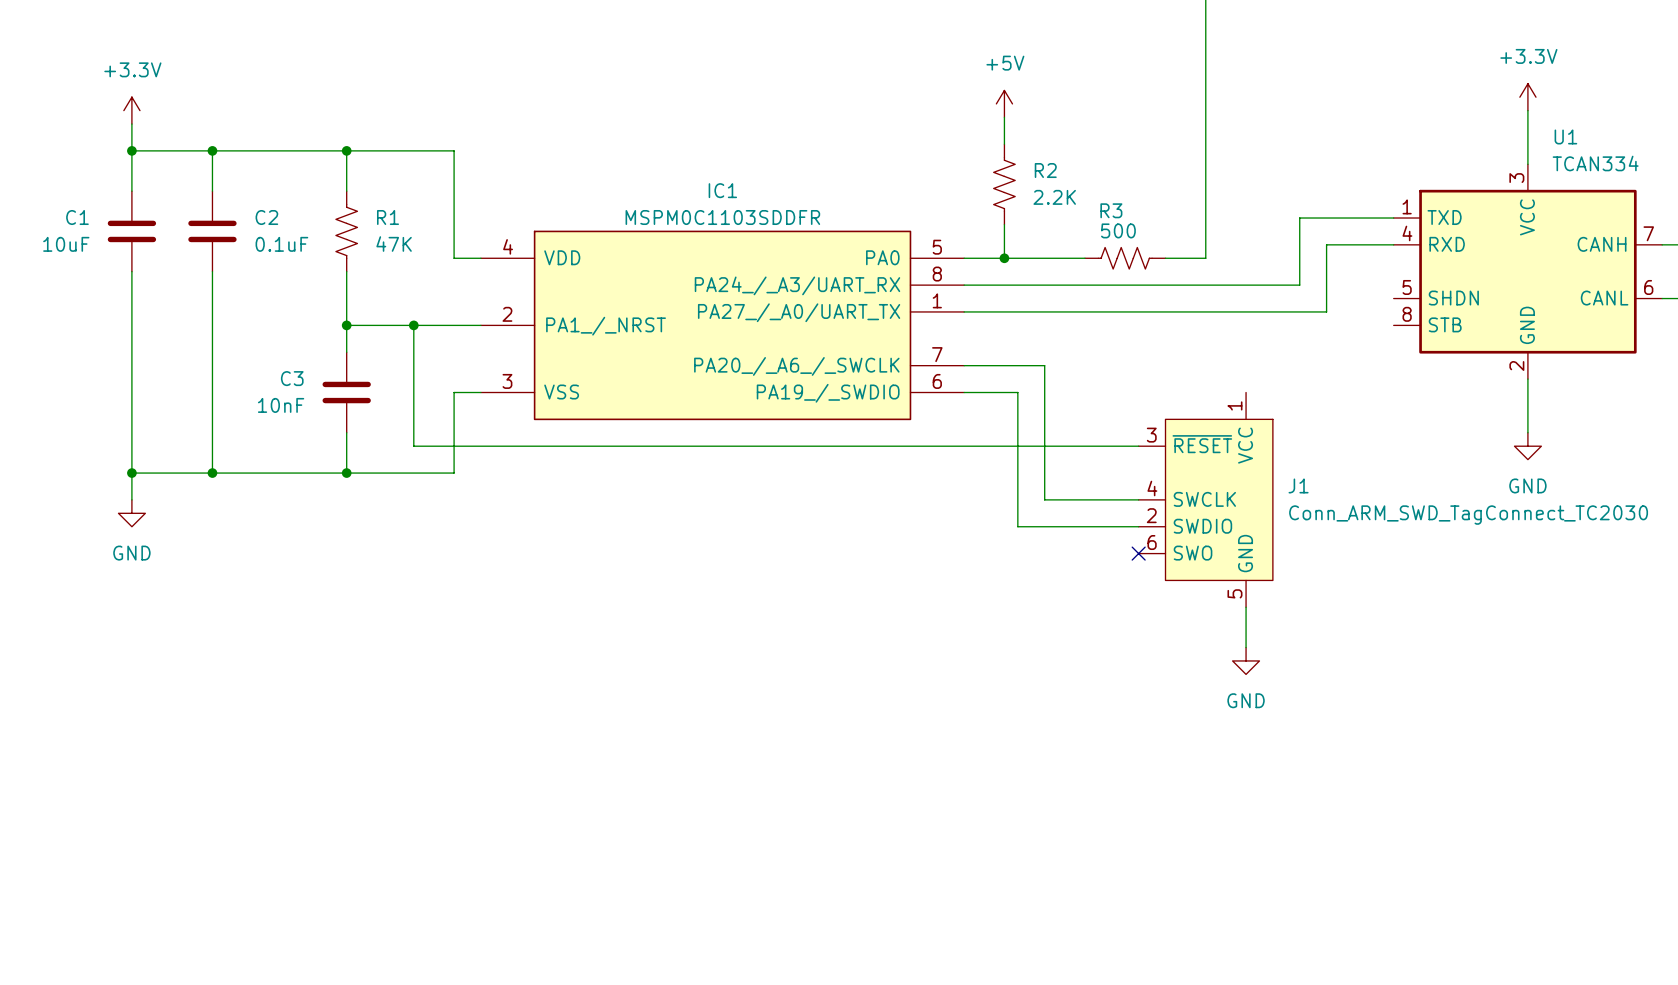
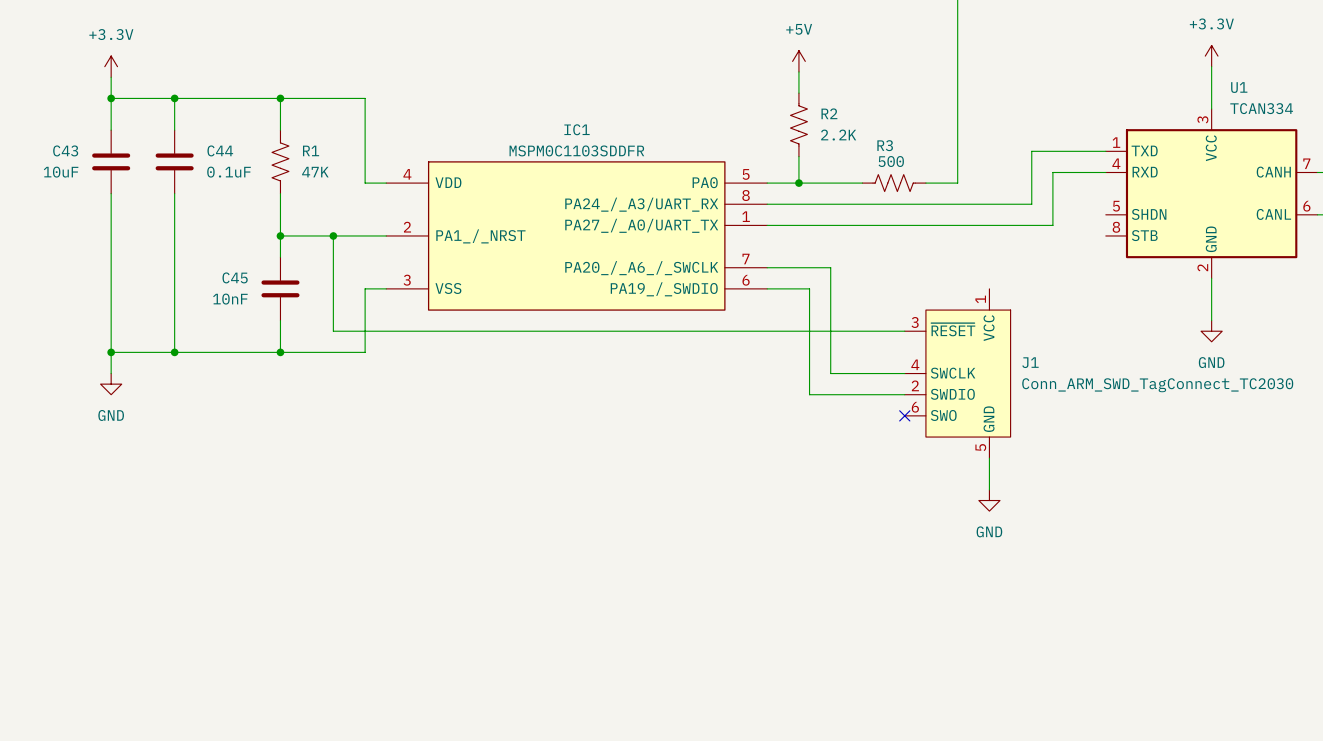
C1 name: C1 (77, 217) -> C43 (65, 150)
C2 name: C2 (266, 217) -> C44 (220, 150)
C3 name: C3 (292, 378) -> C45 (235, 277)

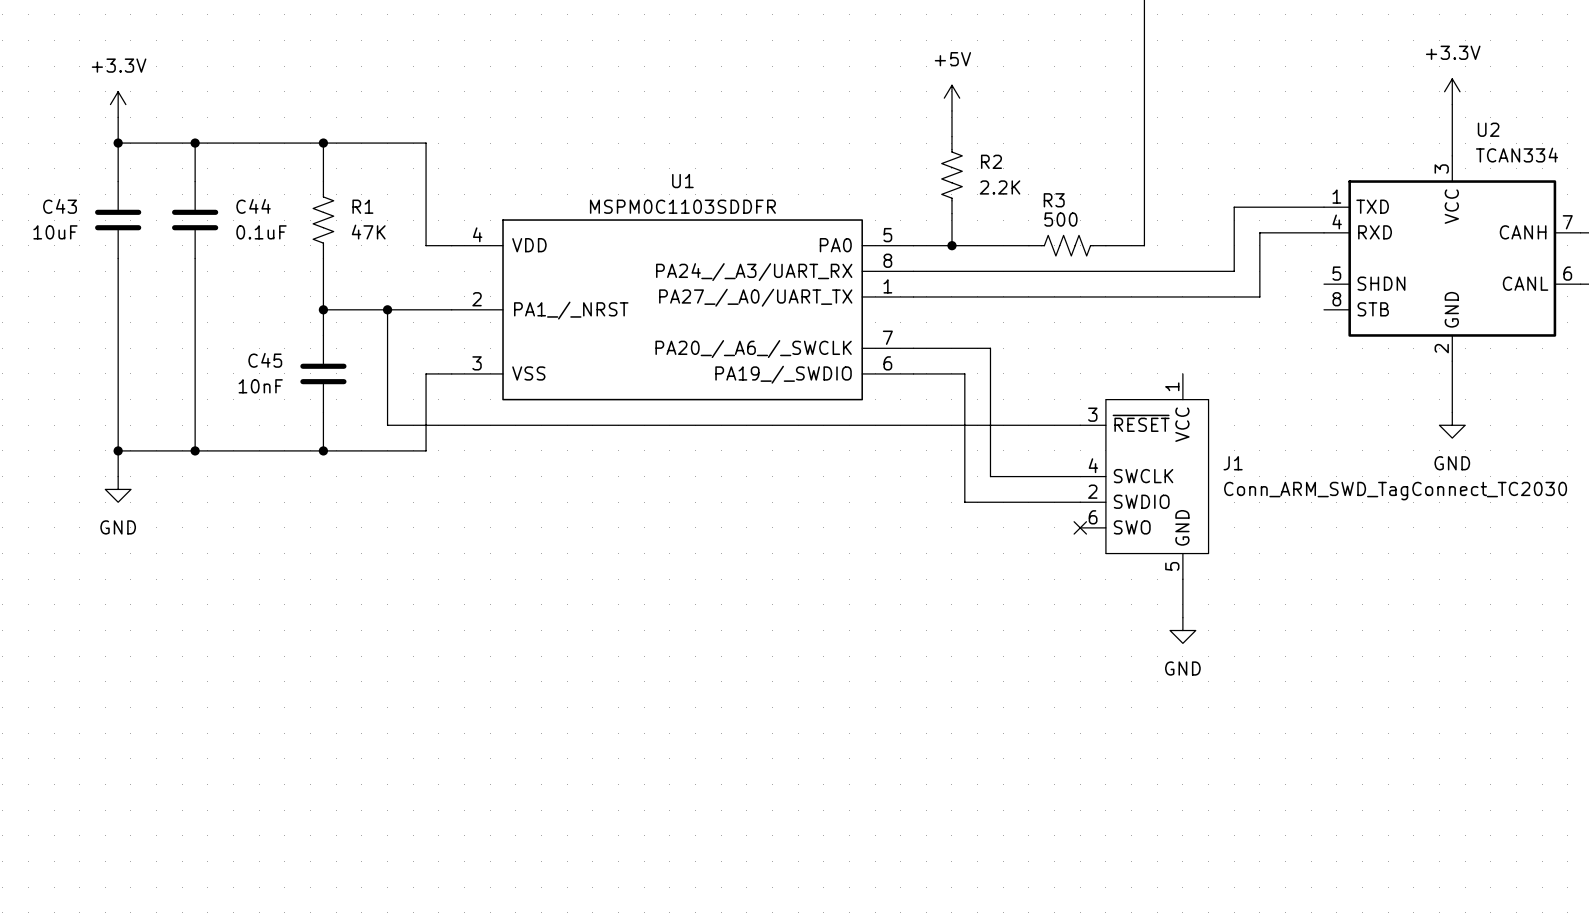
U1 name: U1 (1239, 87) -> U2 (1488, 129)
IC1 name: IC1 (577, 129) -> U1 (682, 181)

